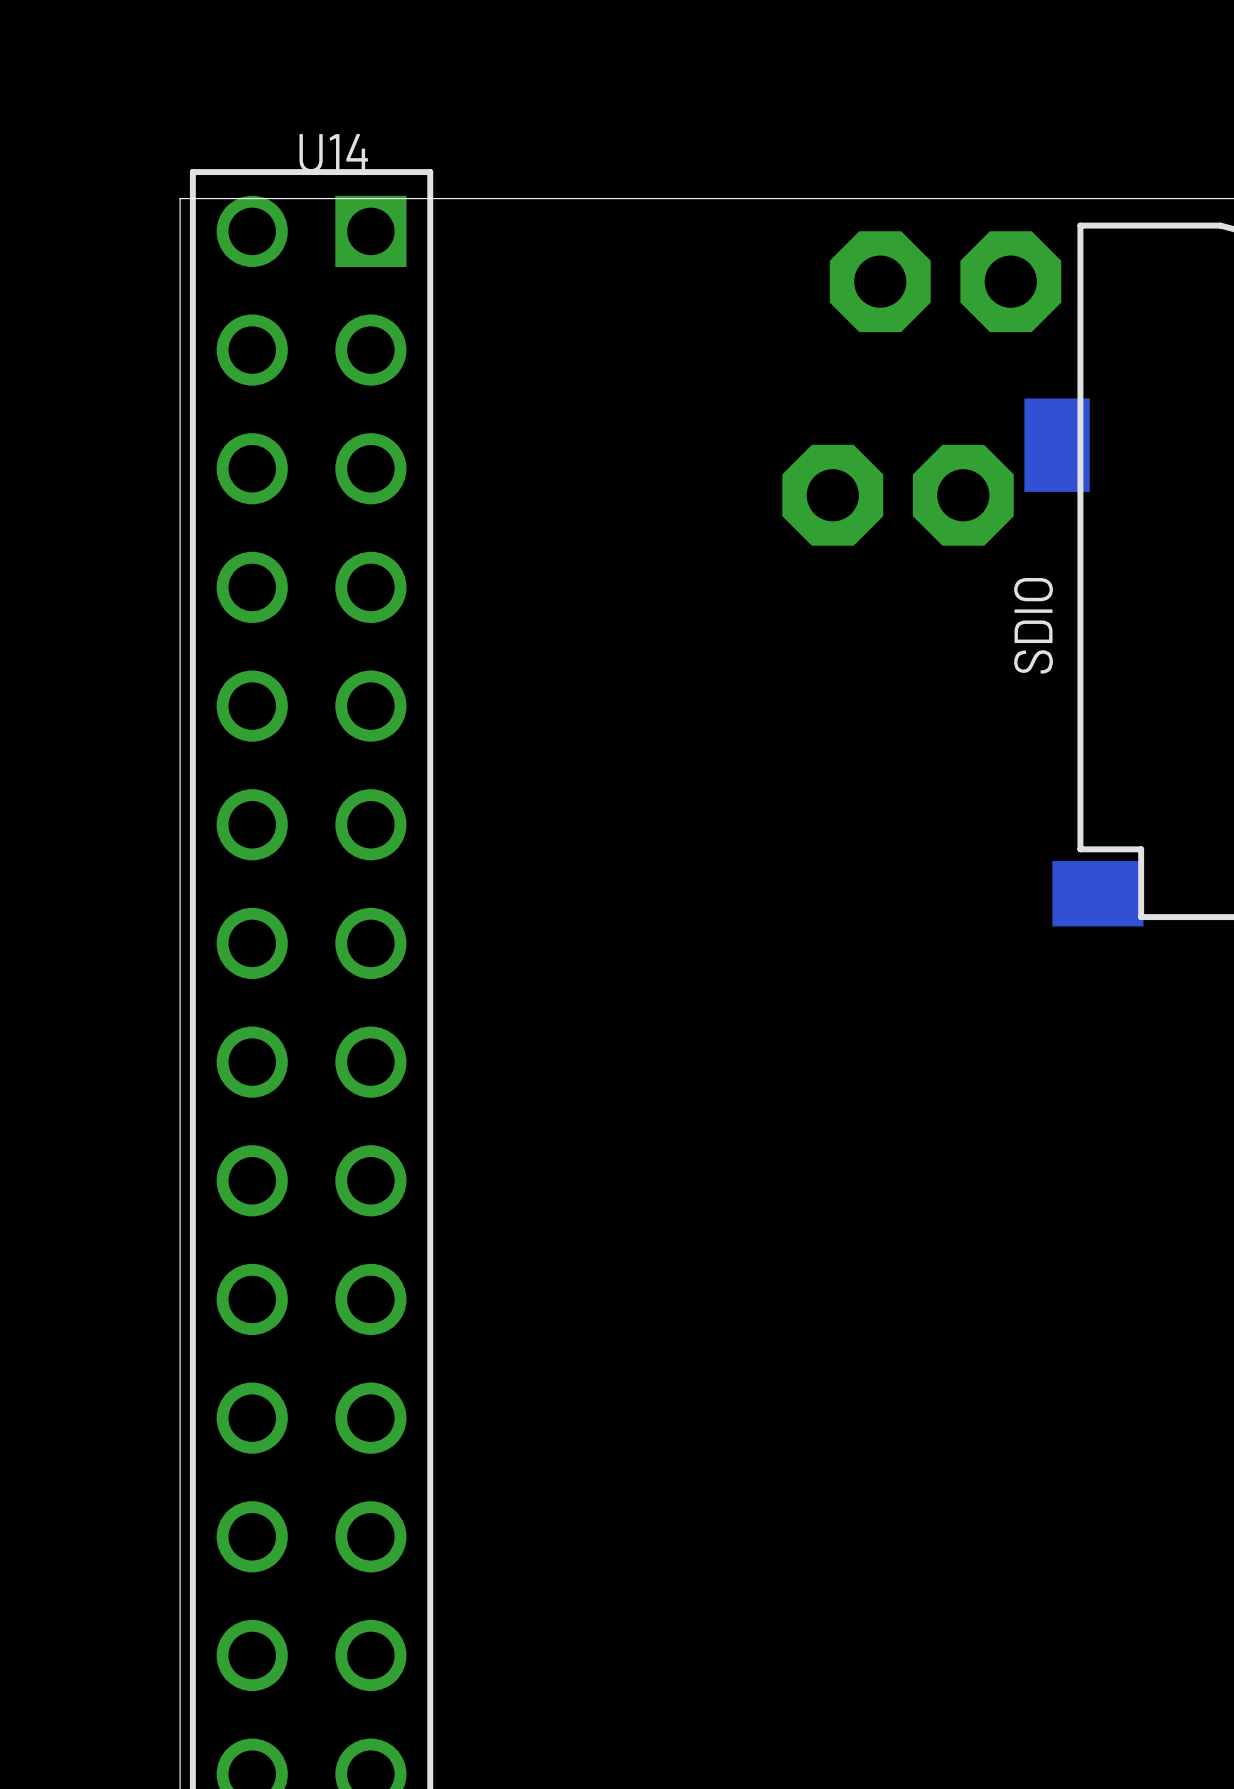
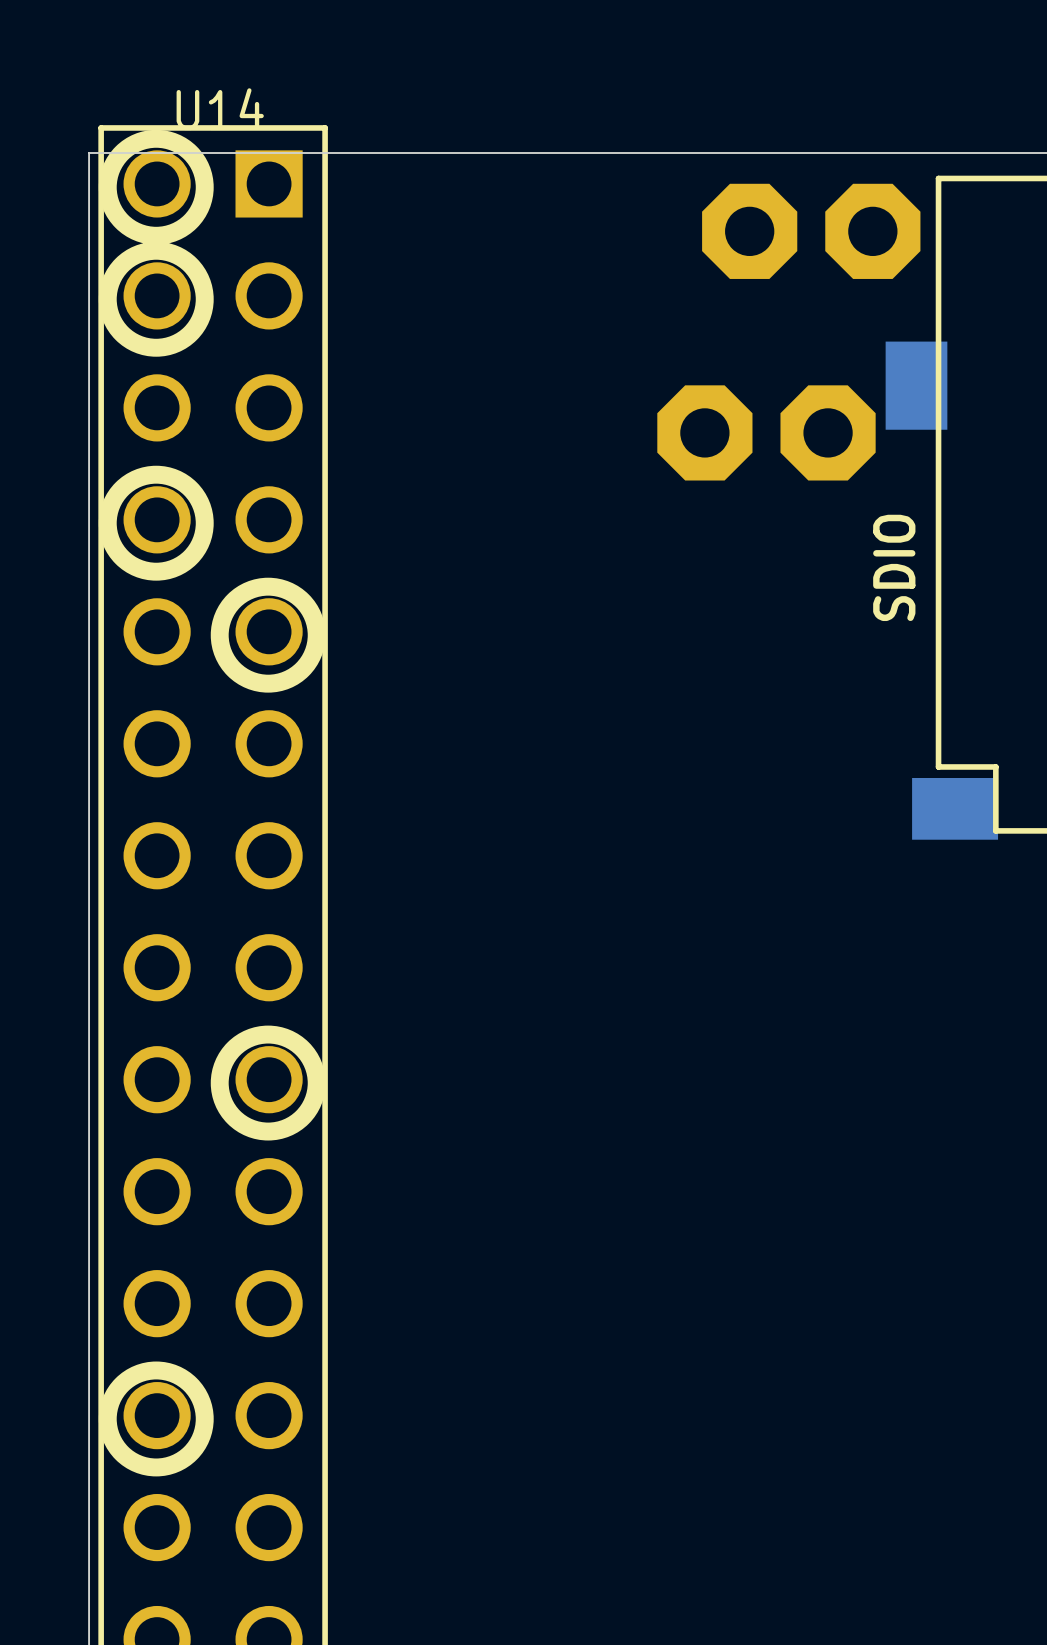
drawing: none -> [98, 129, 214, 357]
drawing: none -> [98, 465, 326, 693]
drawing: none -> [210, 1025, 326, 1141]
drawing: none -> [98, 1361, 214, 1477]

